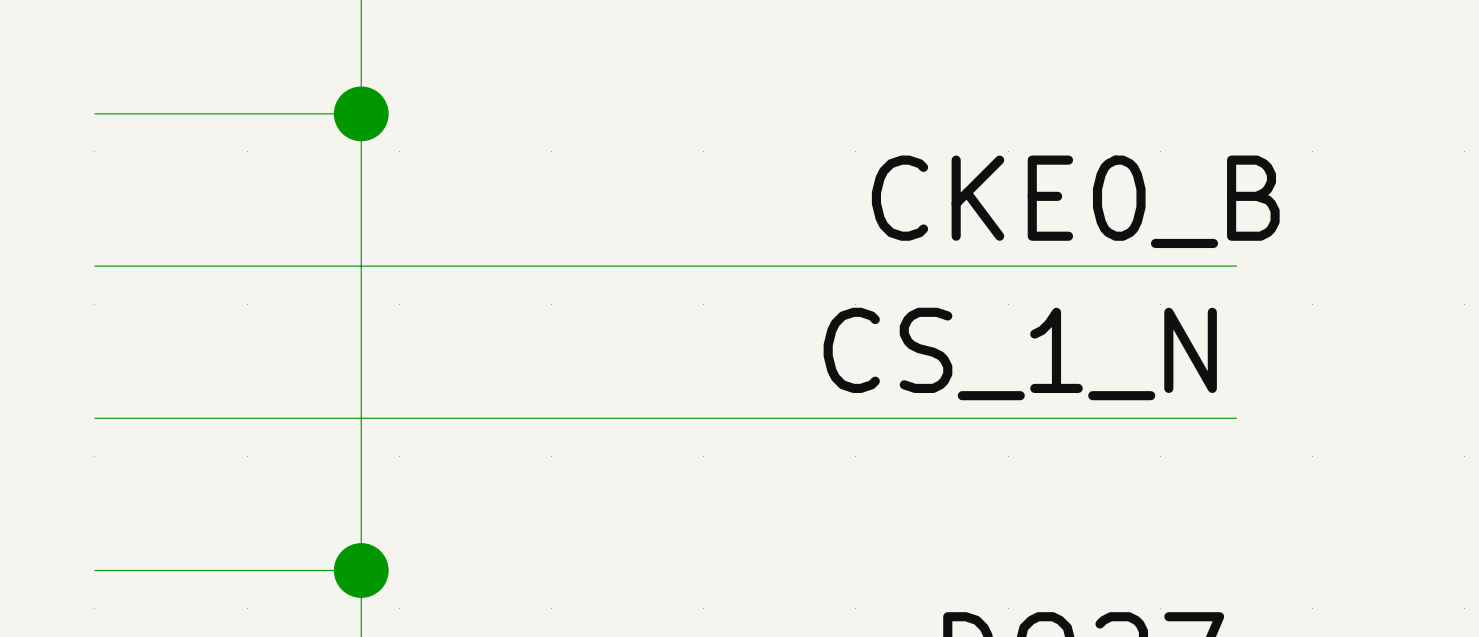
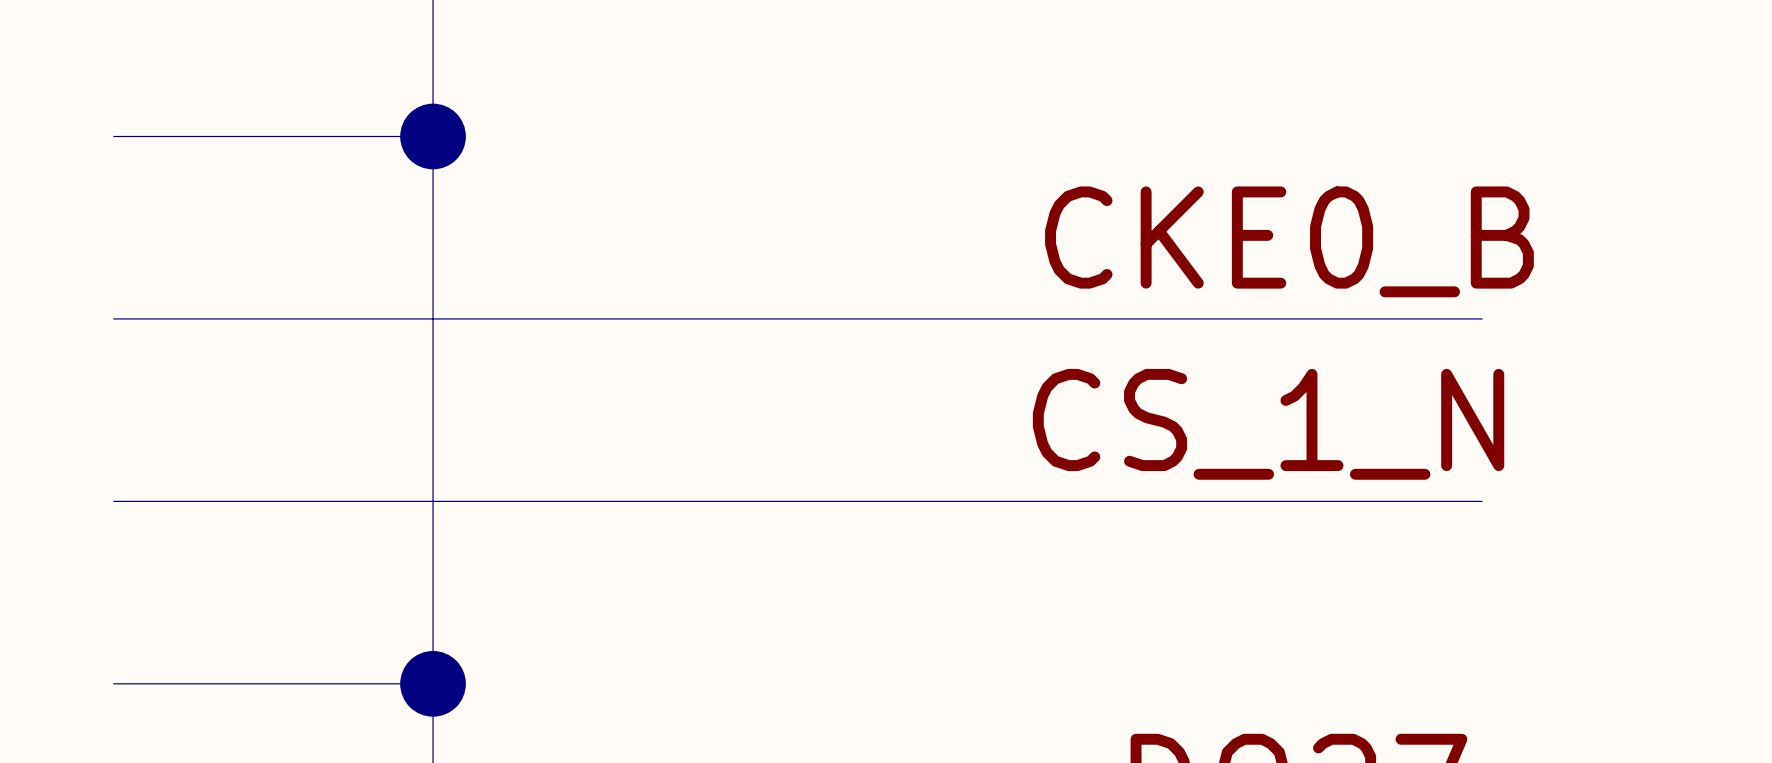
label position: CS_1_N (1020, 354) -> CS_1_N (1268, 424)

